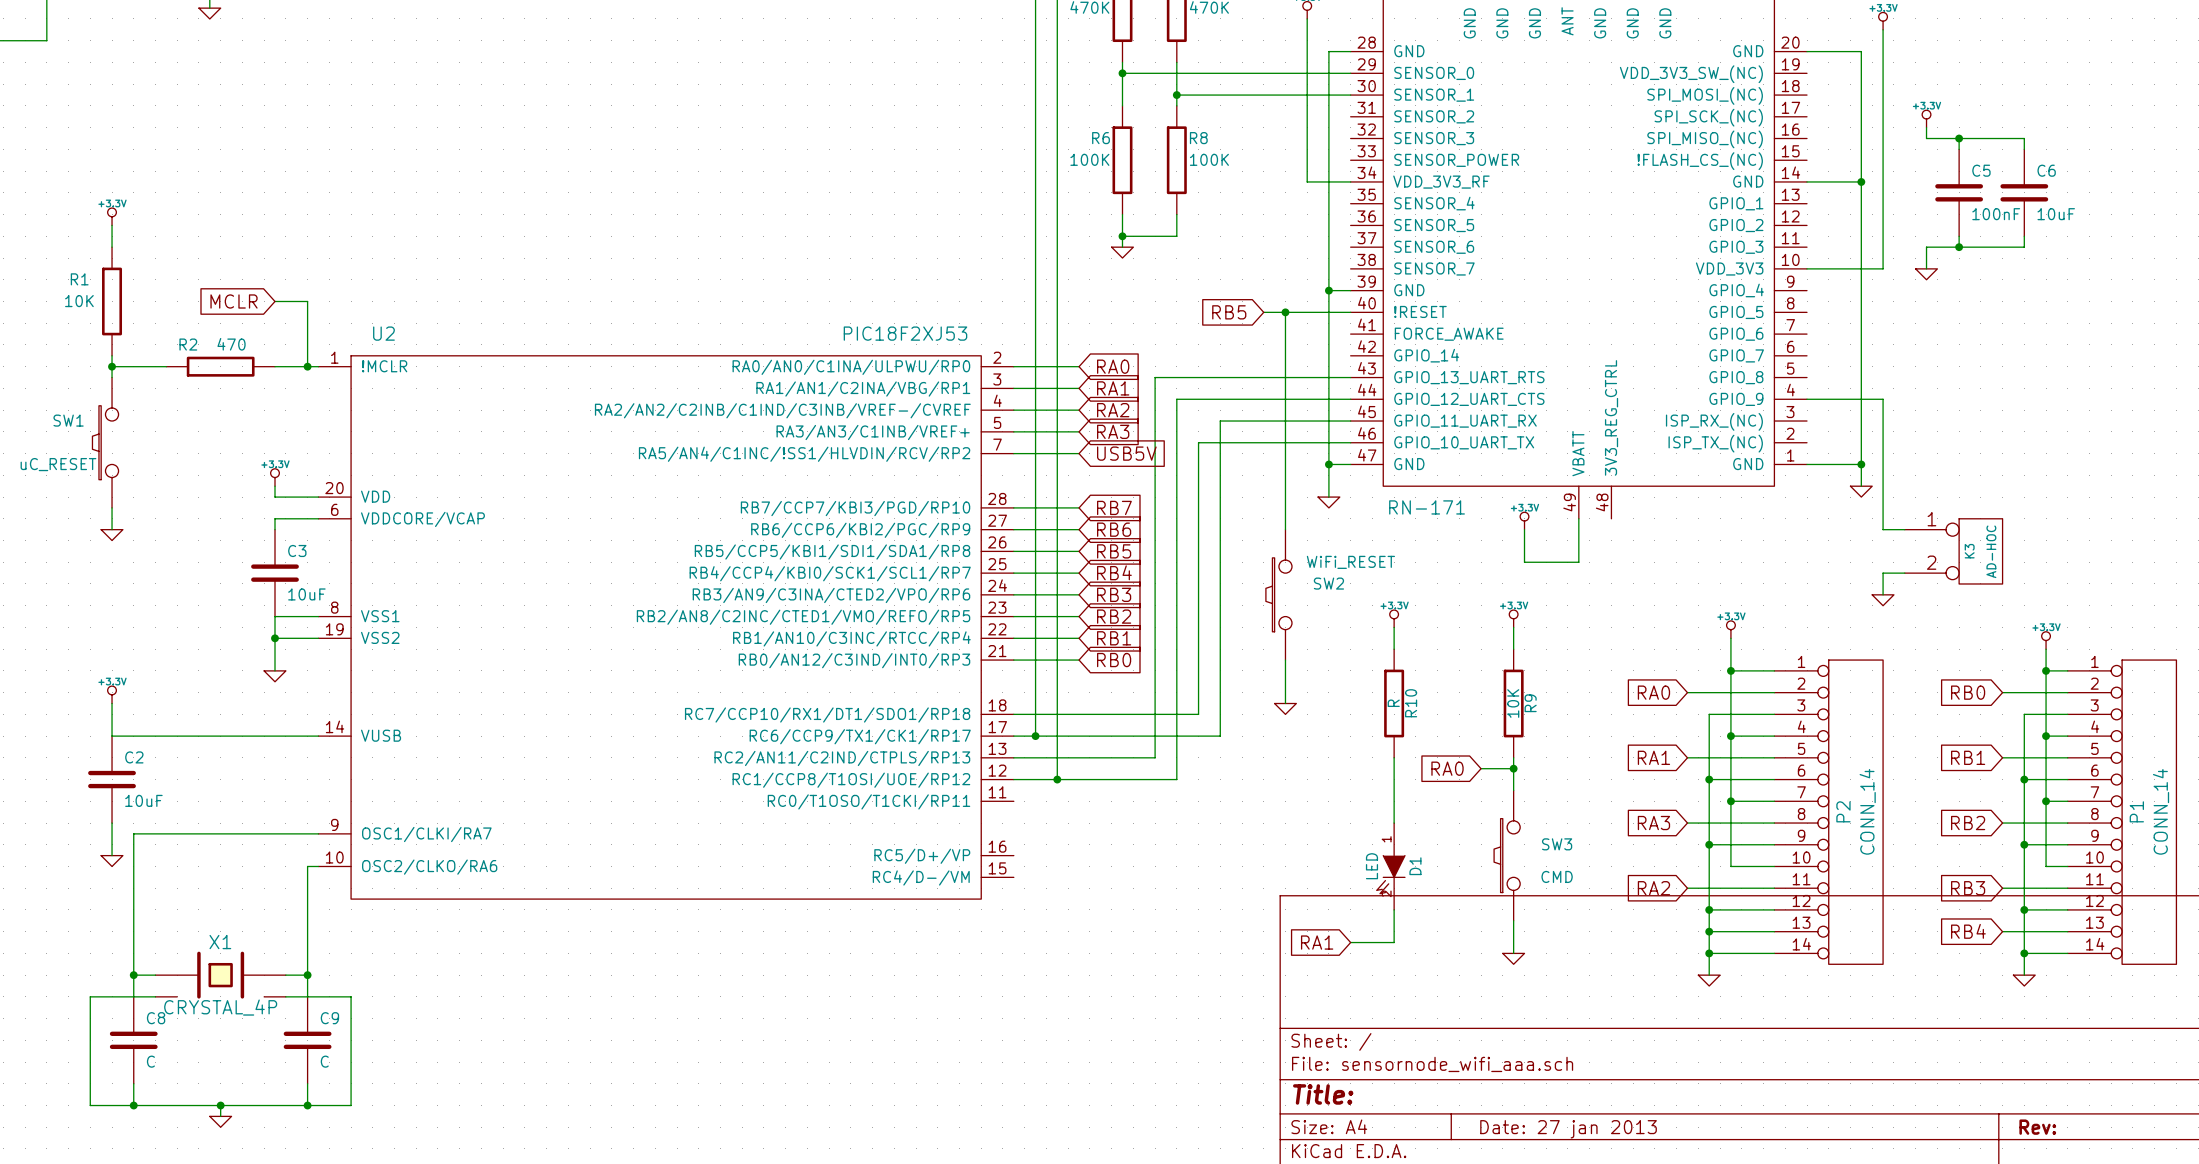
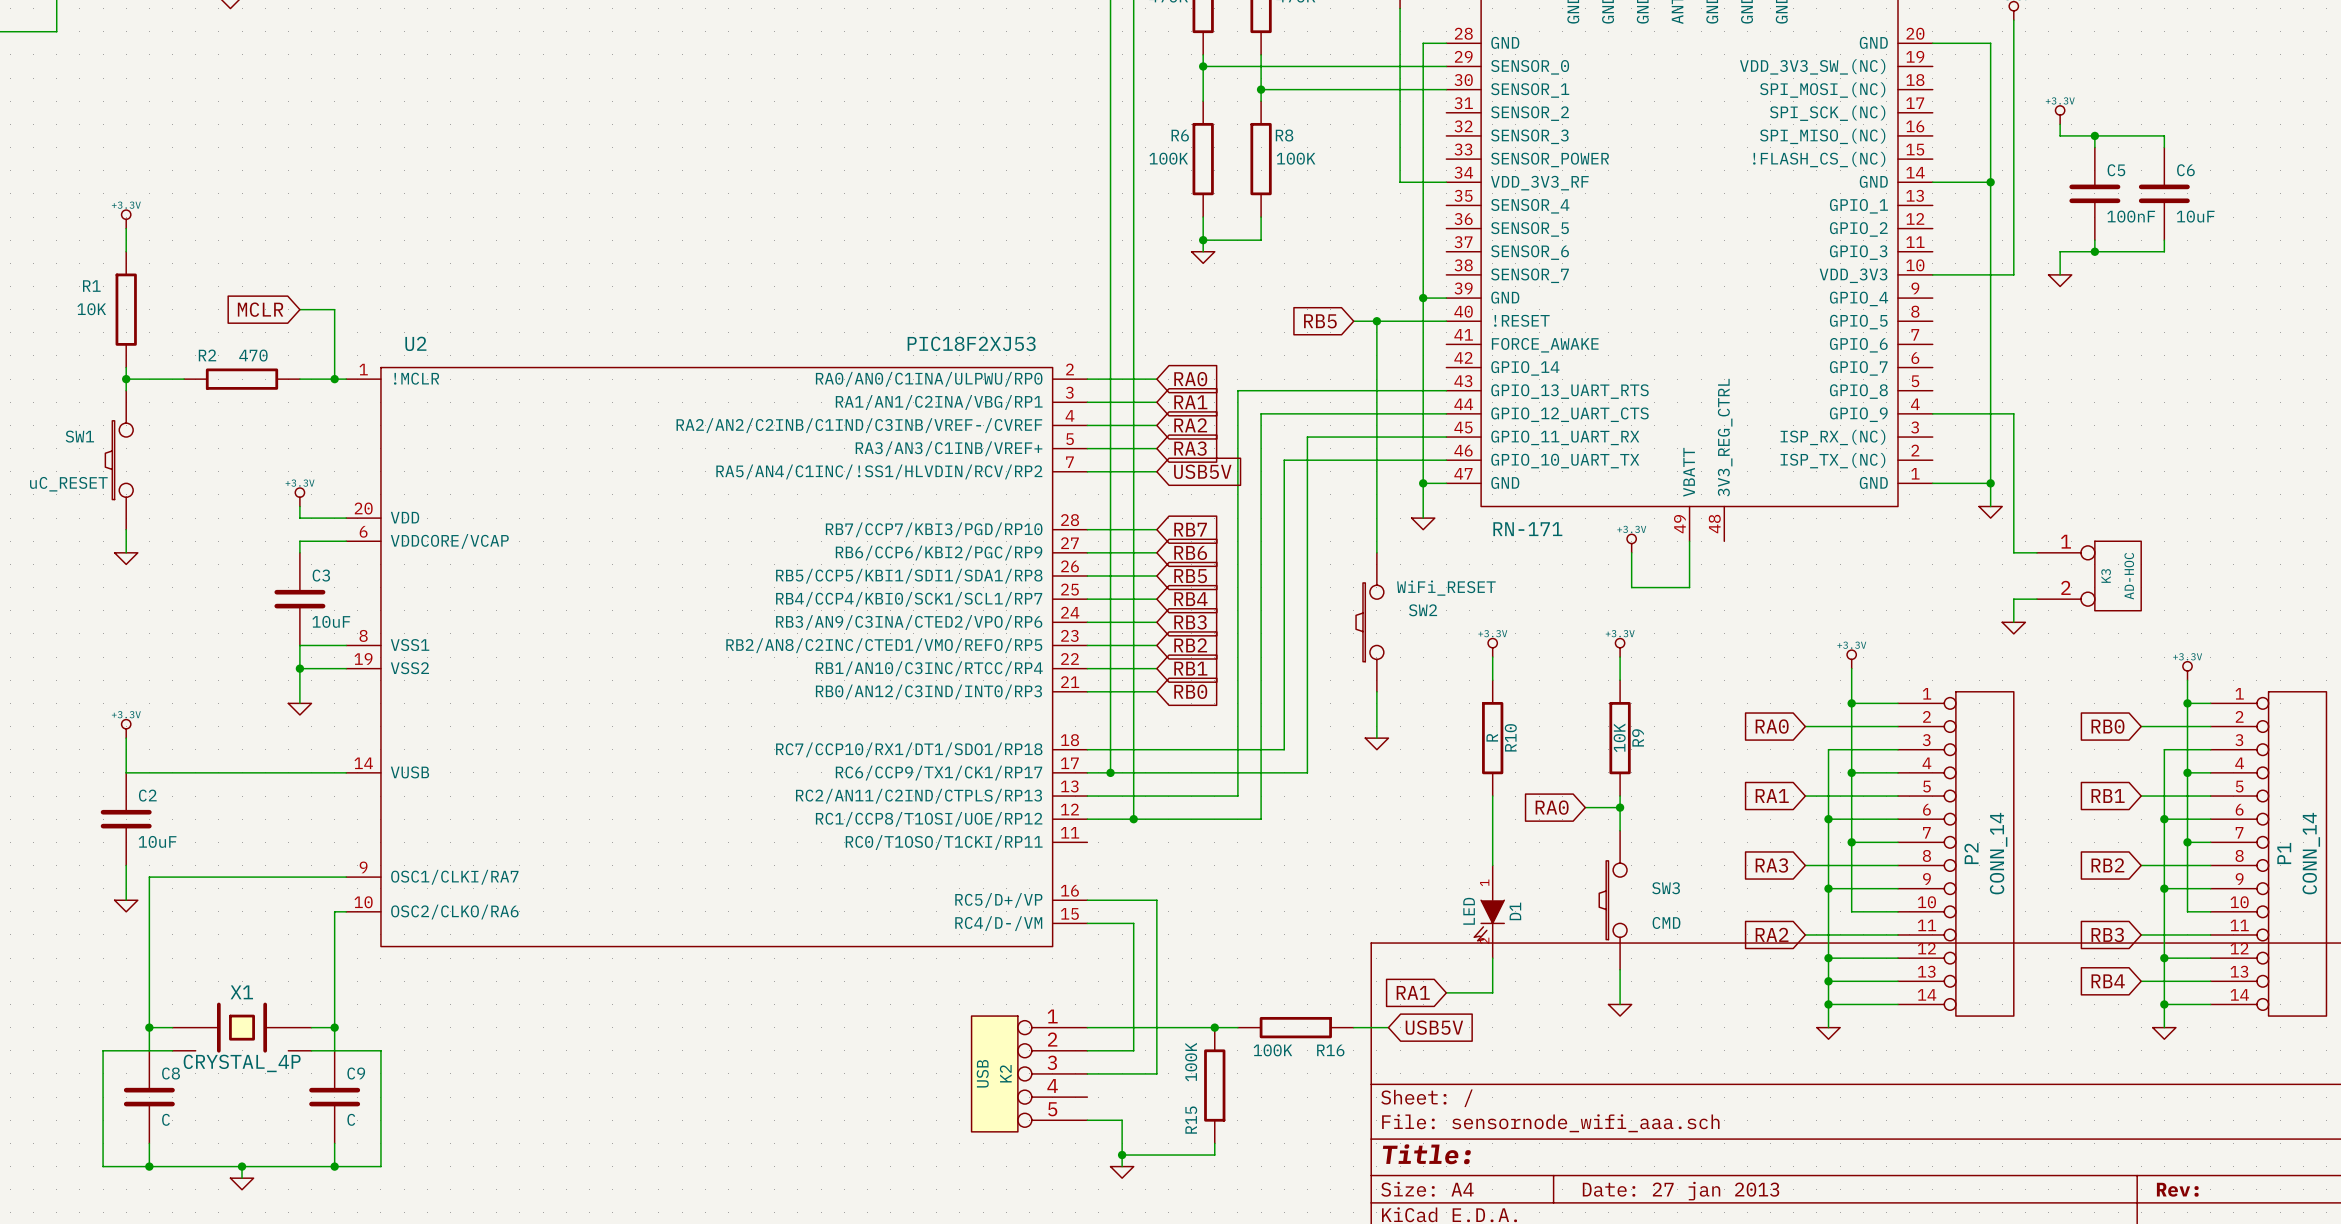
wire: none -> (1087, 900) (1156, 900) (1156, 1073) (1087, 1073)
wire: none -> (1087, 923) (1133, 923) (1133, 1050) (1087, 1050)
wire: none -> (1087, 1027) (1237, 1027)
junction: none -> (1214, 1027)
R16: none -> 100K (1295, 1027)
wire: none -> (1353, 1027) (1388, 1027)
global label: none -> USB5V (1434, 1027)
K2: none -> USB (1029, 1073)
R15: none -> 100K (1214, 1085)
wire: none -> (1087, 1120) (1122, 1120) (1122, 1166)
wire: none -> (1214, 1143) (1214, 1155) (1122, 1155)
junction: none -> (1122, 1155)
power symbol: none -> (1122, 1172)

